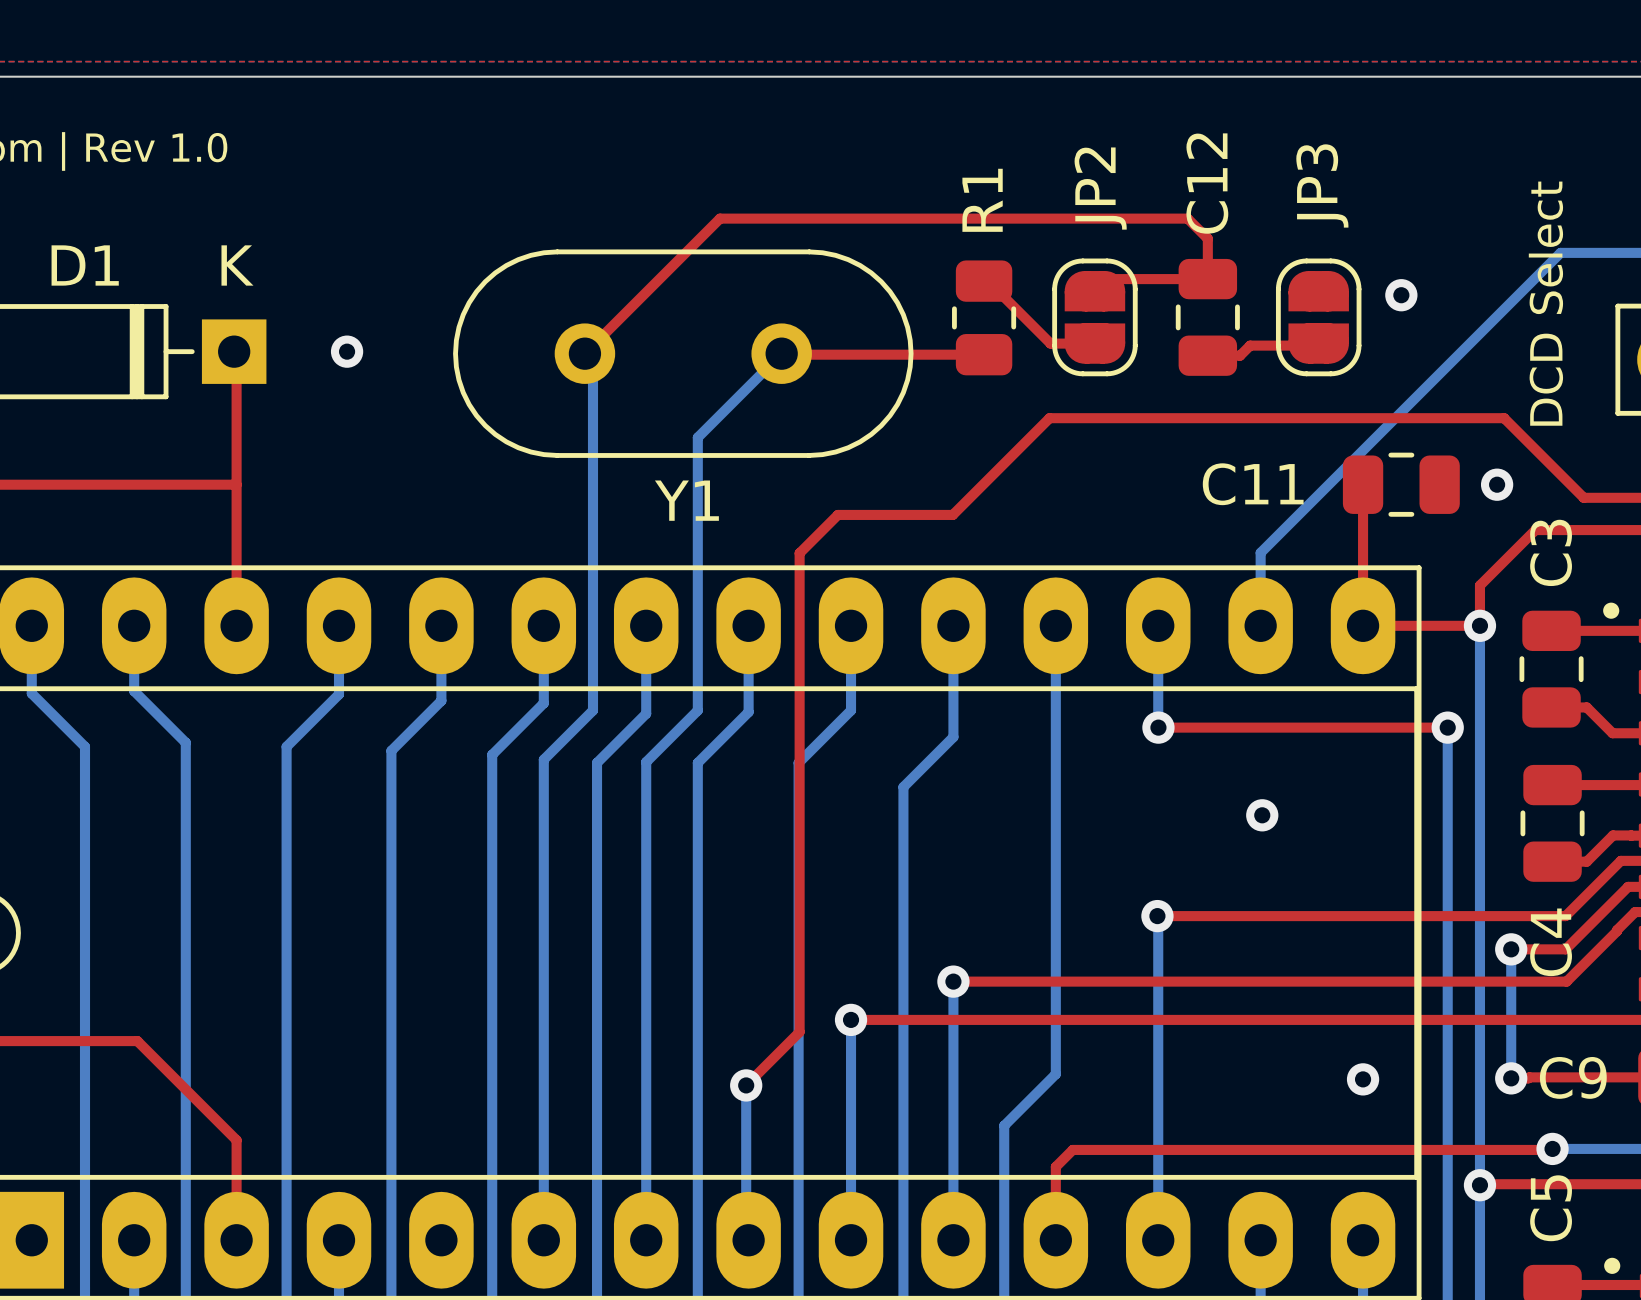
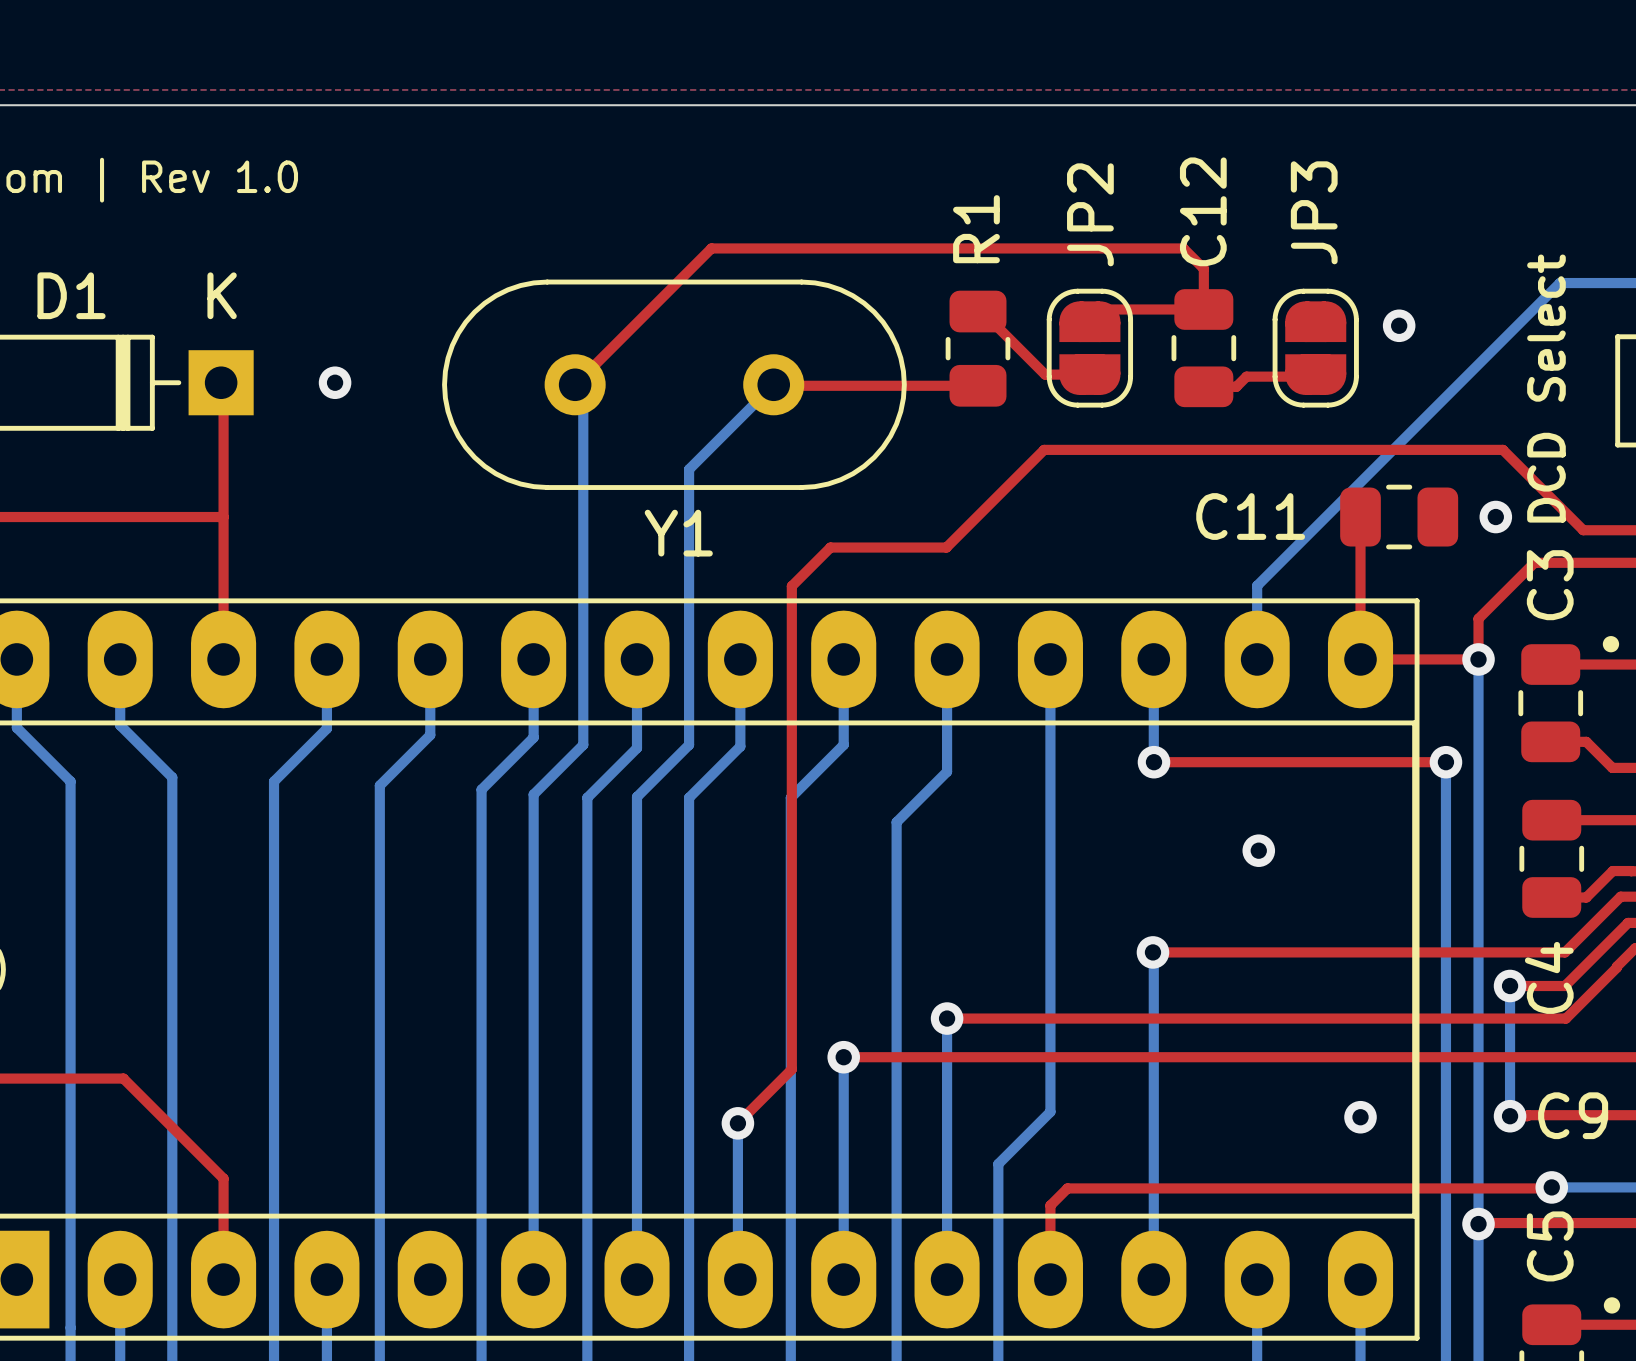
part value position: DCD Select (1545, 303) -> DCD Select (1546, 388)

